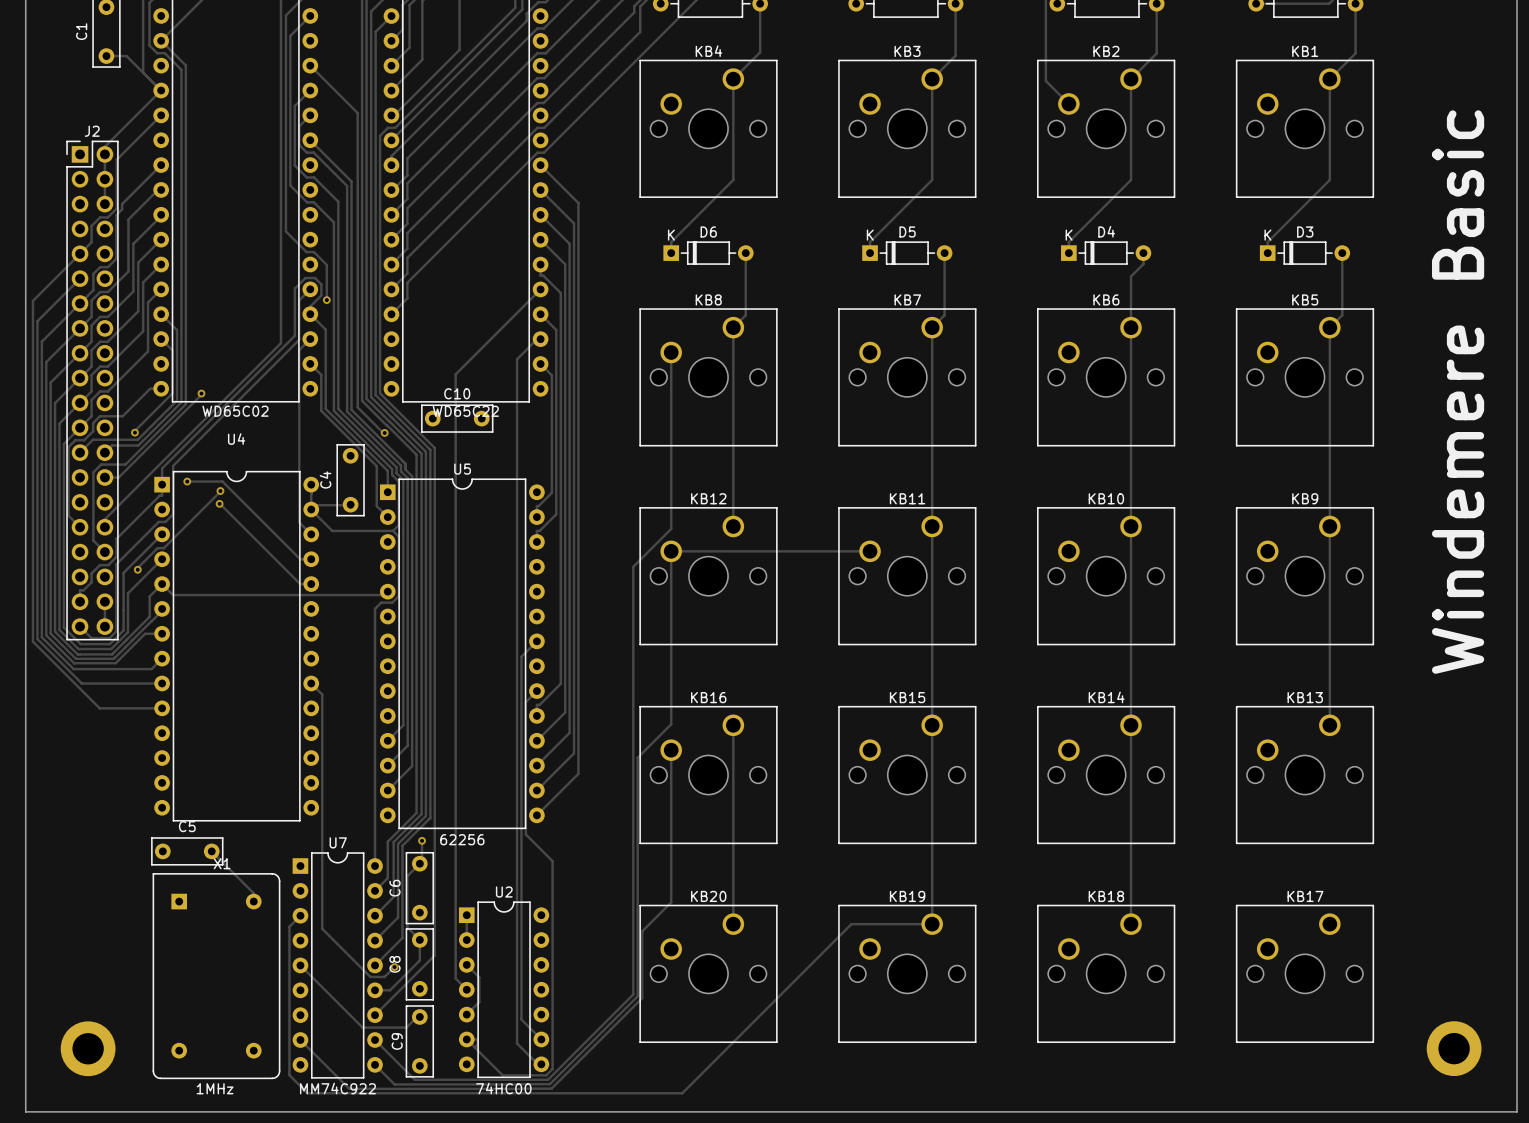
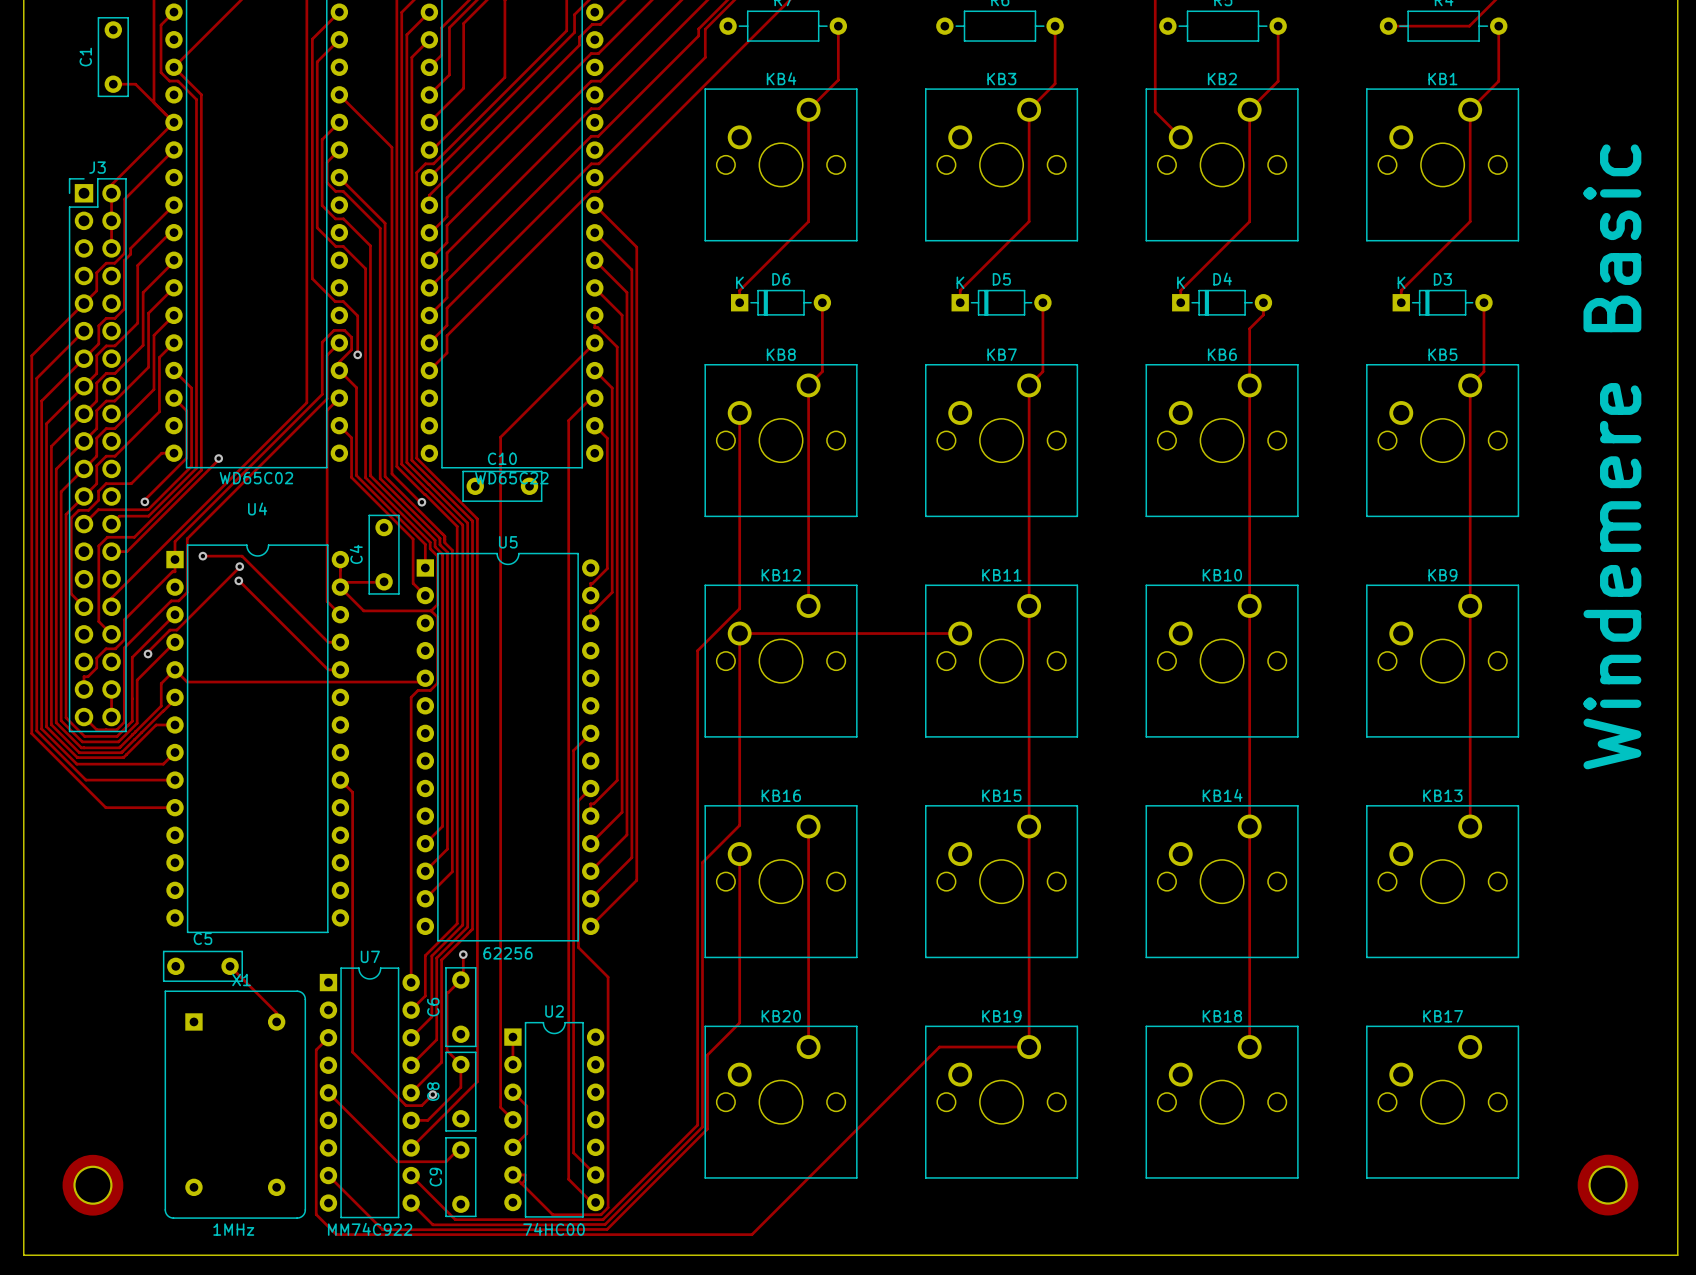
J2 name: J2 (92, 131) -> J3 (97, 167)

